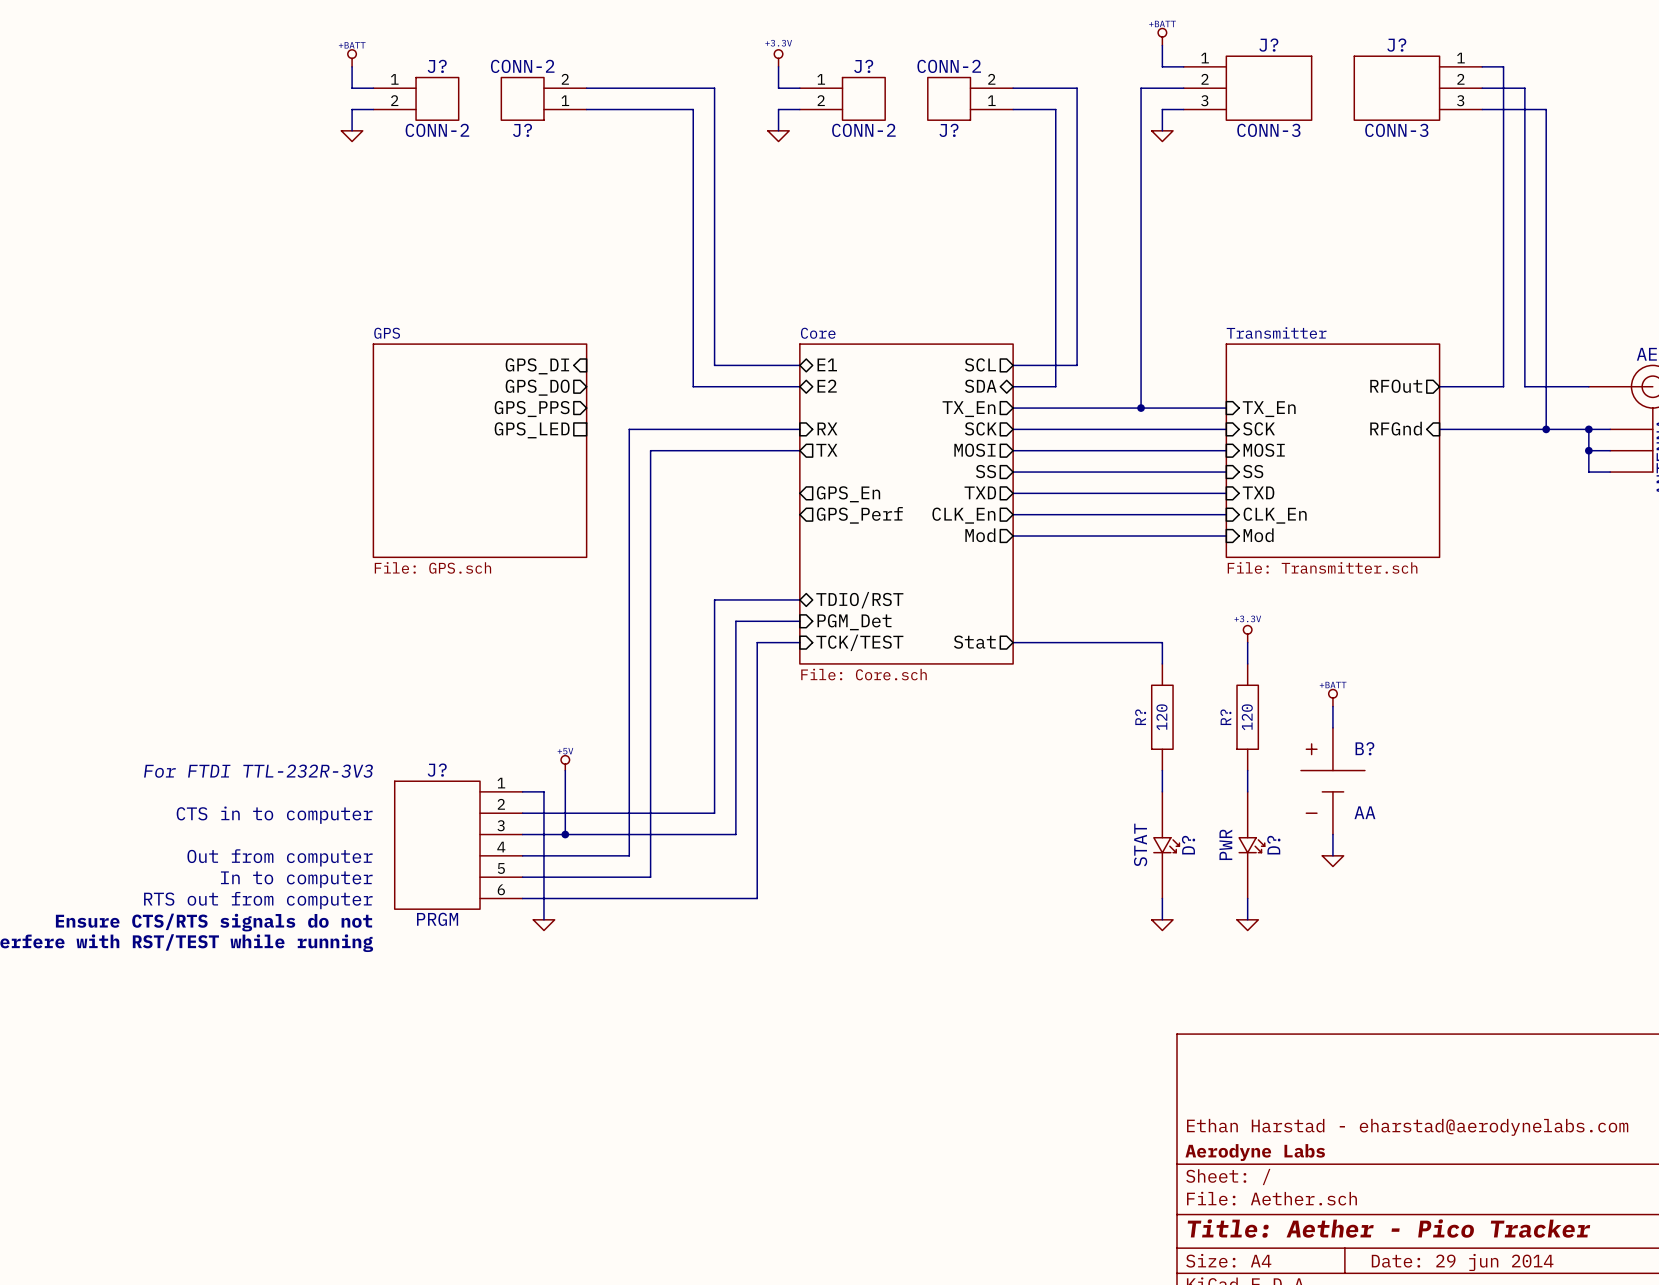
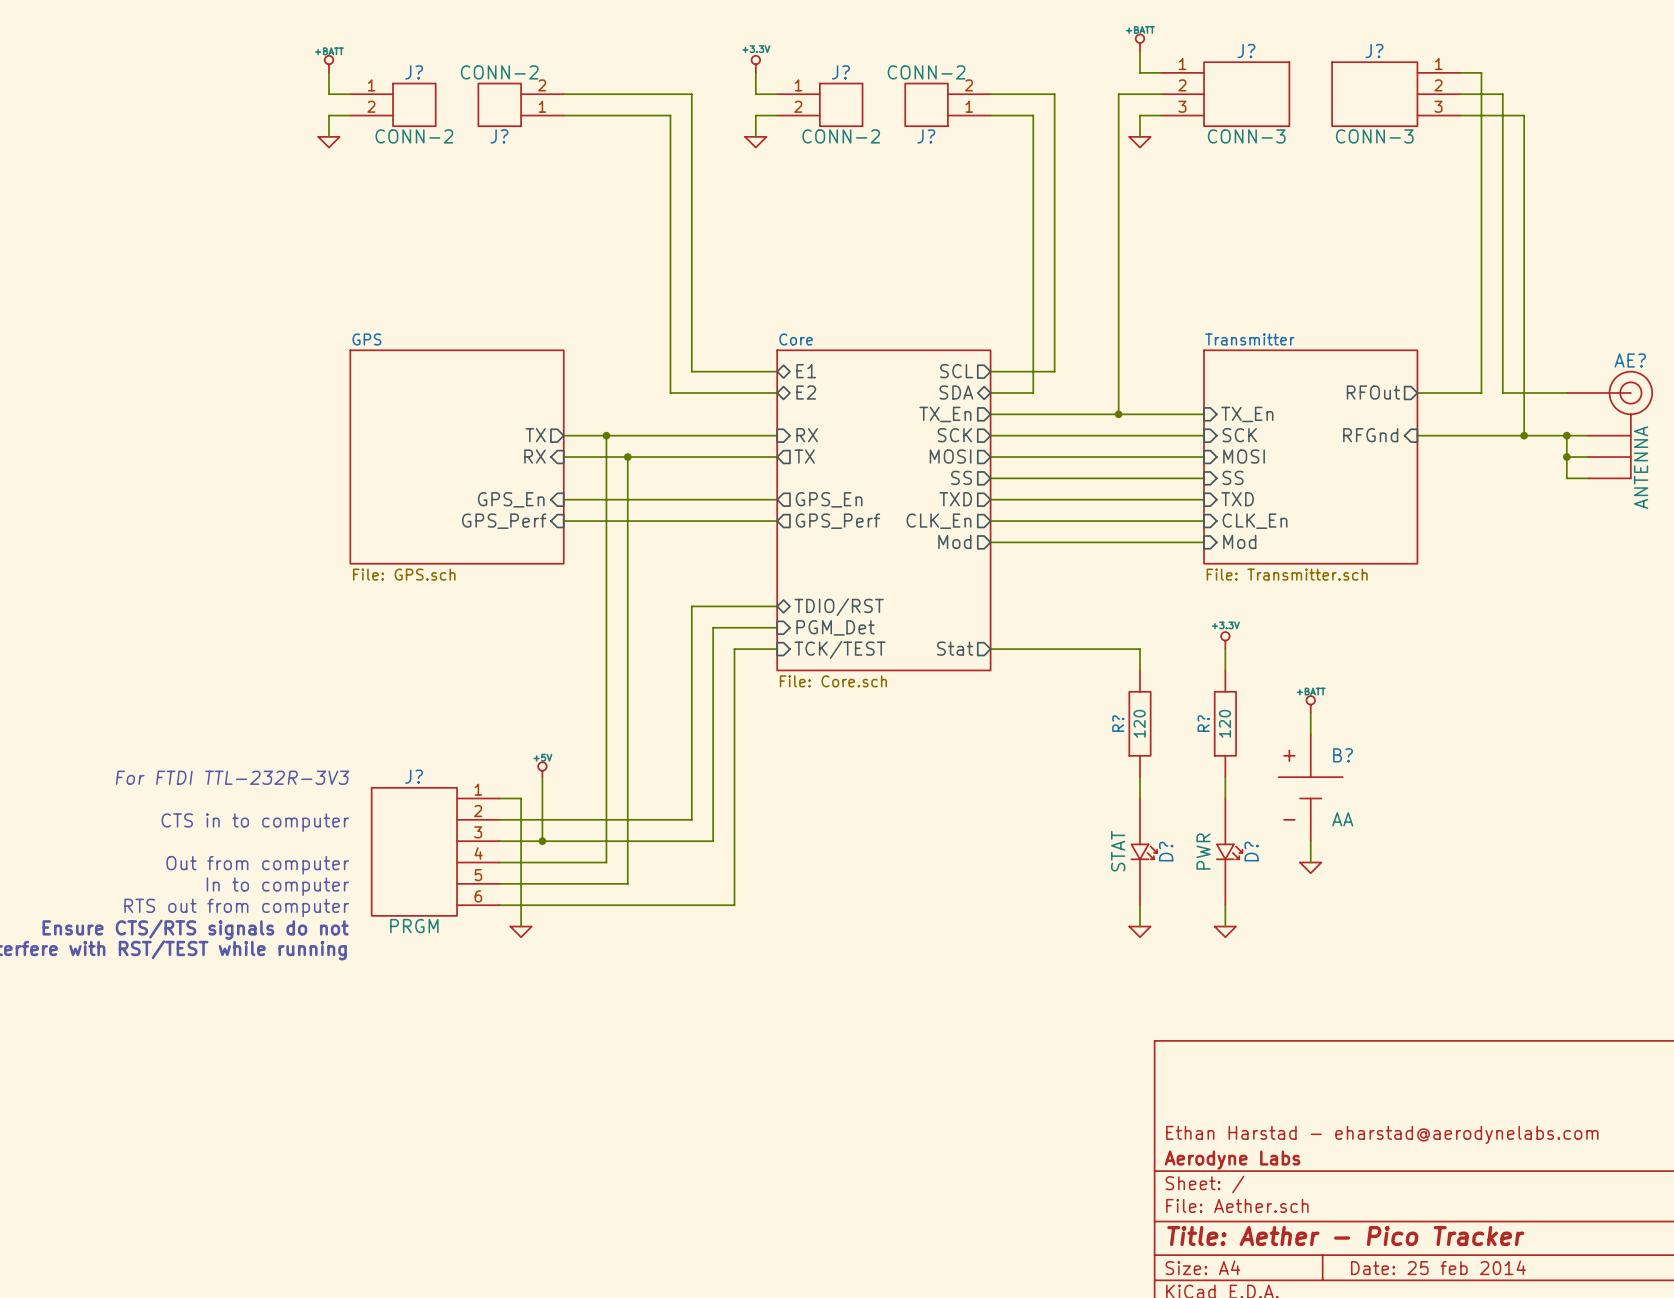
sheet pin: GPS_DI (537, 366) -> none
sheet pin: GPS_DO (537, 387) -> none
sheet pin: GPS_PPS (532, 409) -> none
wire: none -> (563, 435) (606, 435)
junction: none -> (606, 435)
sheet pin shape: passive (532, 430) -> output (535, 435)
sheet pin: GPS_LED (532, 430) -> TX (535, 435)
sheet pin: none -> RX (535, 456)
wire: none -> (563, 457) (627, 457)
junction: none -> (627, 457)
wire: none -> (563, 499) (777, 499)
sheet pin: none -> GPS_En (511, 499)
wire: none -> (563, 521) (777, 521)
sheet pin: none -> GPS_Perf (504, 521)
title block: Date: 29 jun 2014 (1462, 1262) -> Date: 25 feb 2014 (1438, 1267)

